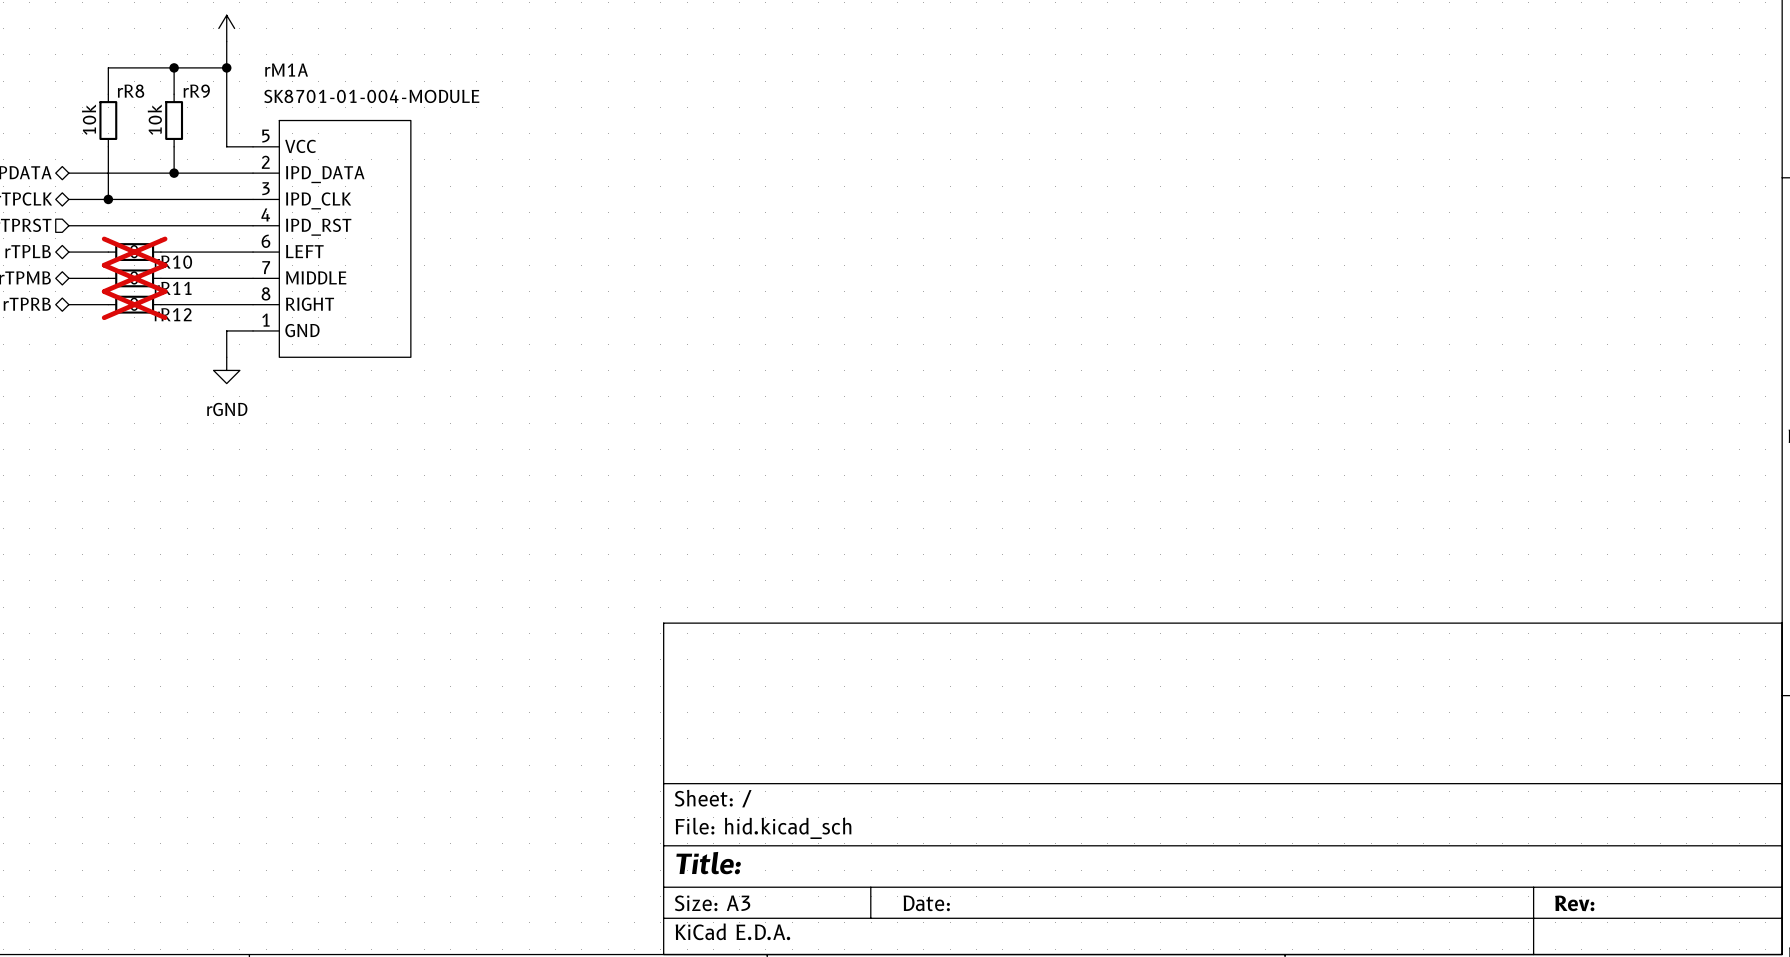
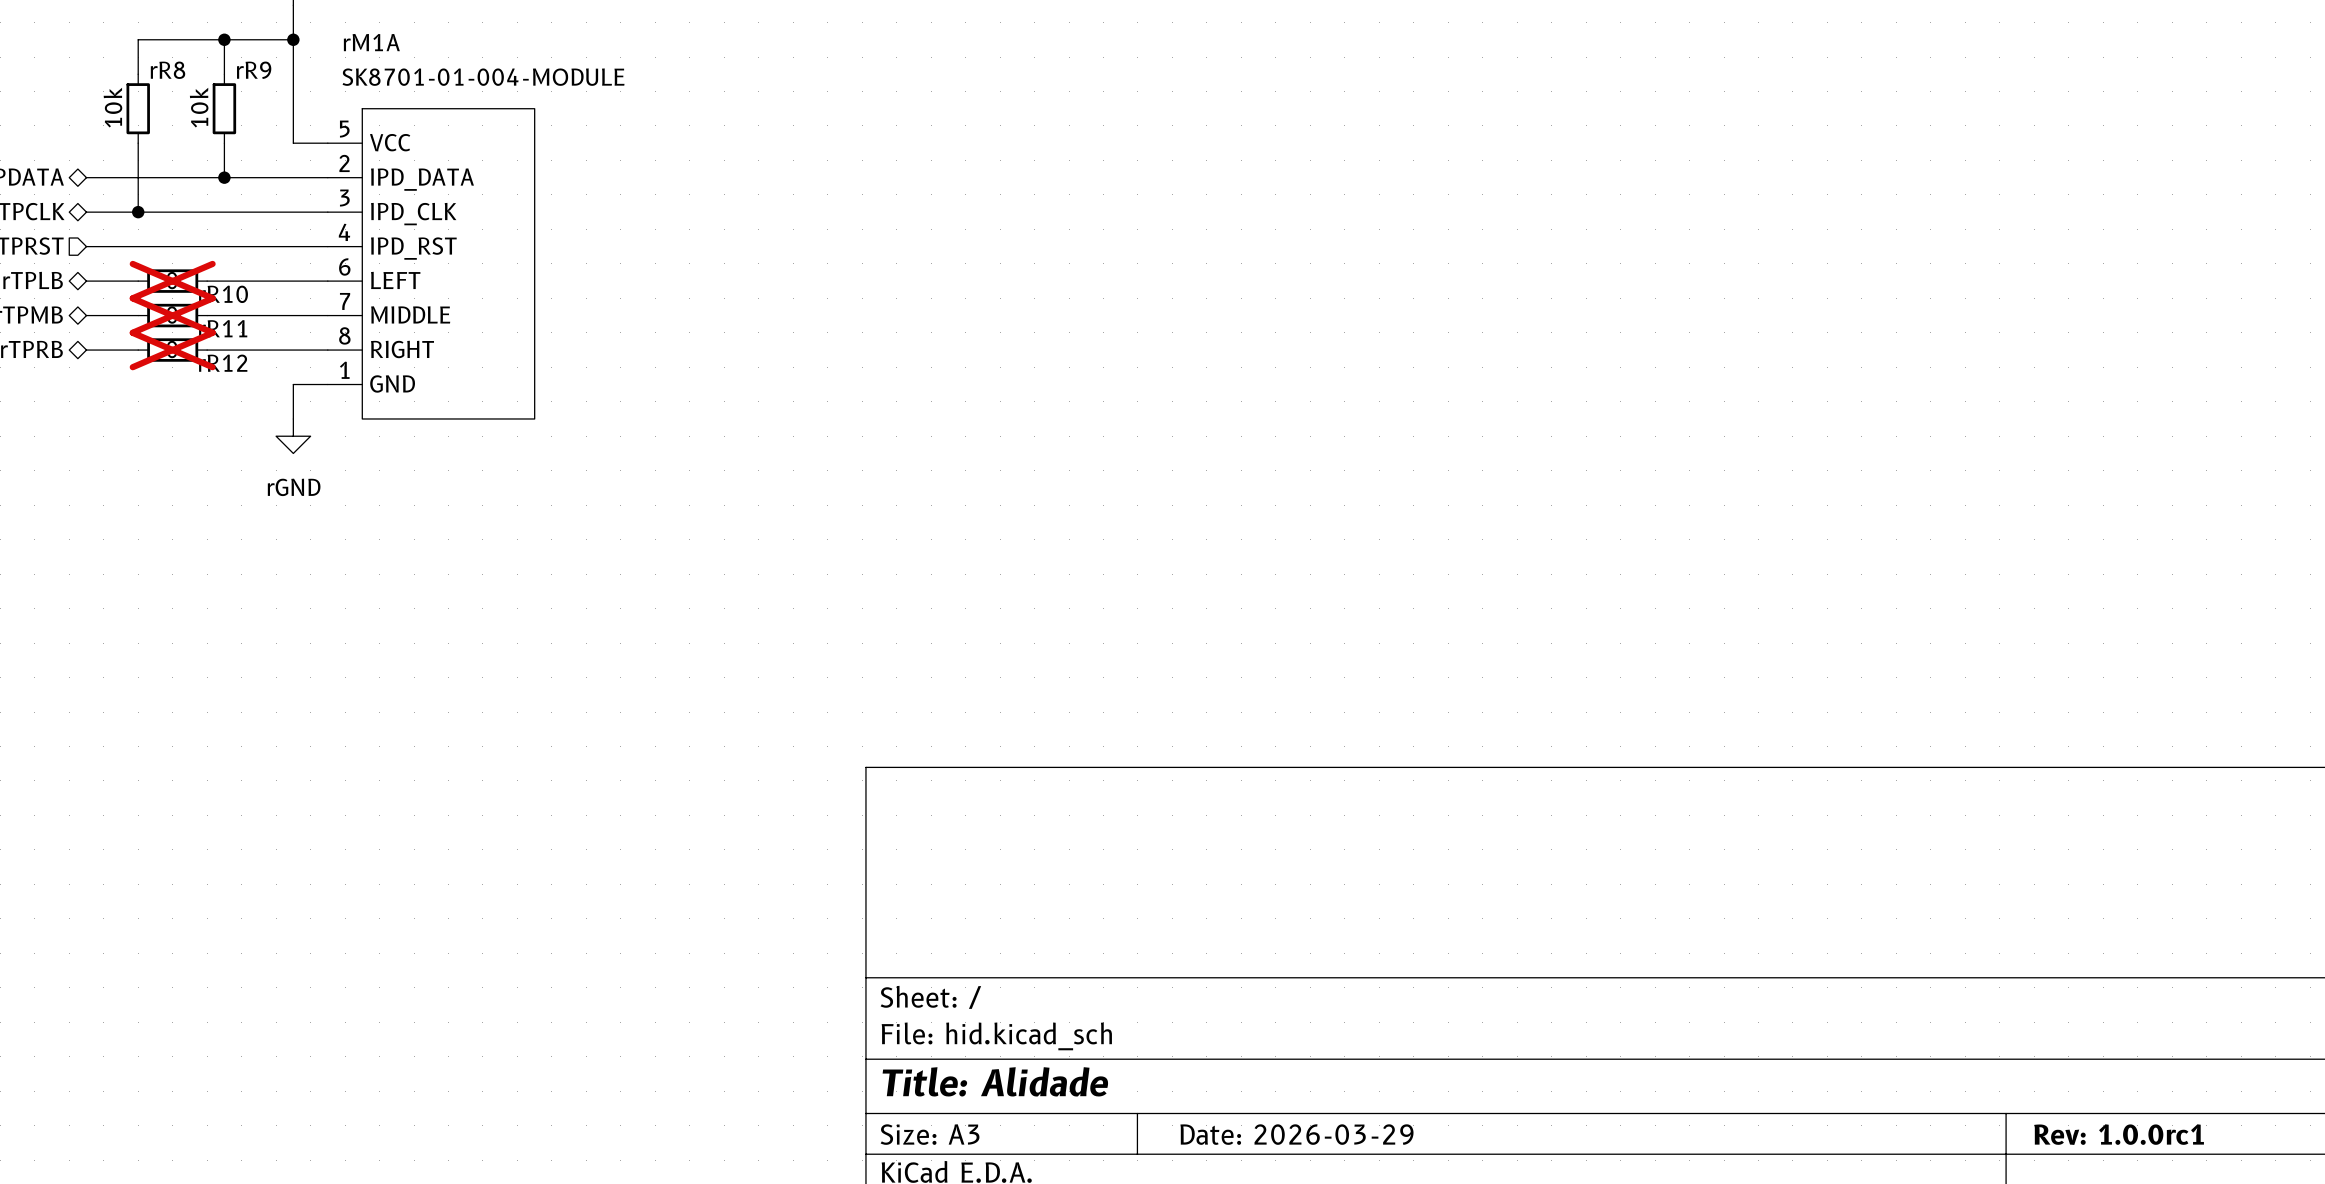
title block: Title: (708, 863) -> Title: Alidade (995, 1081)
title block: Date: (926, 903) -> Date: 2026-03-29 (1296, 1134)
title block: Rev: (1574, 903) -> Rev: 1.0.0rc1 (2119, 1134)

